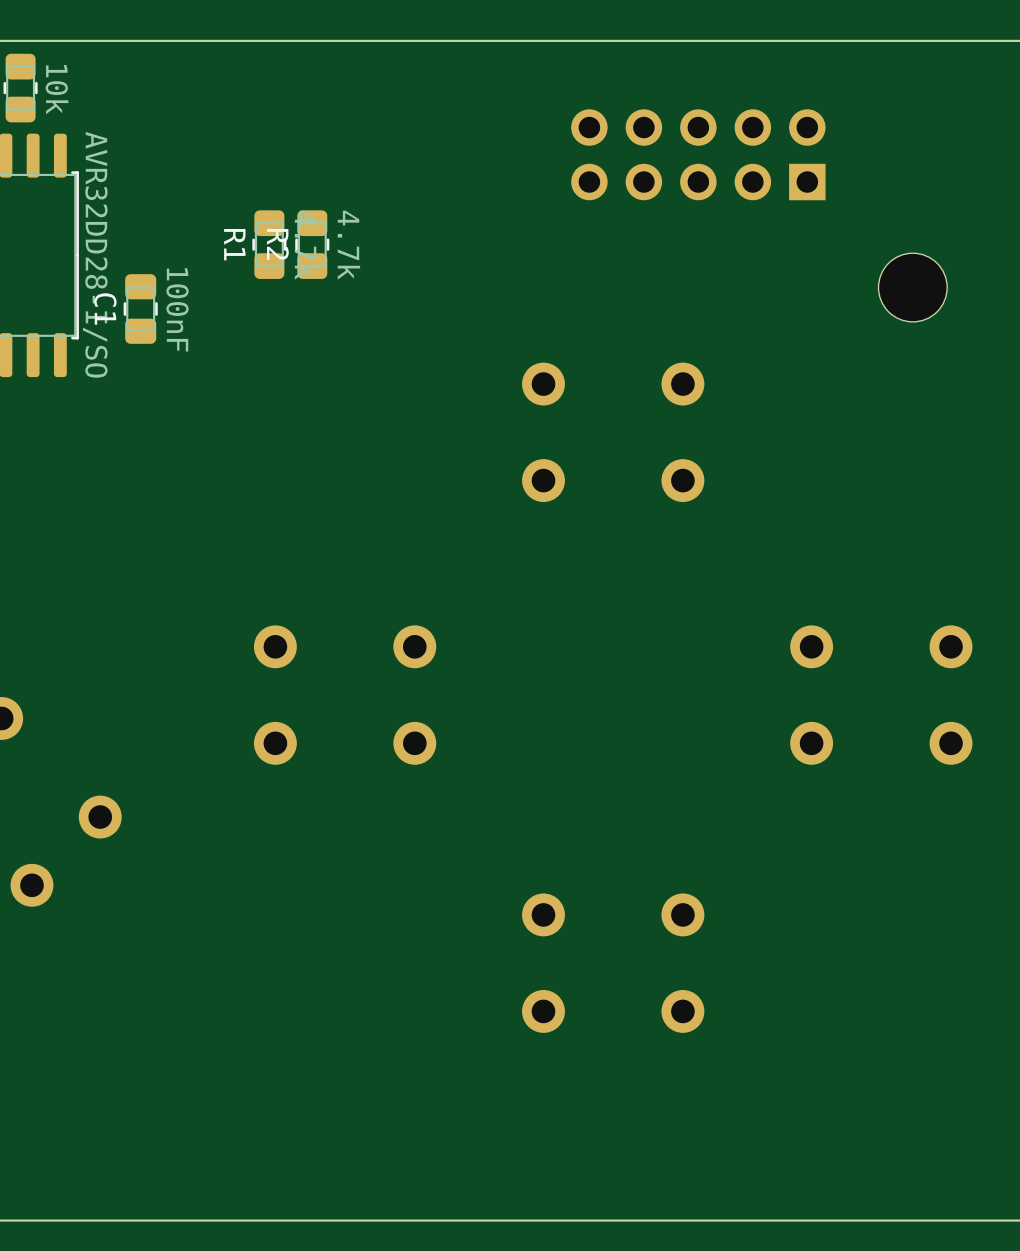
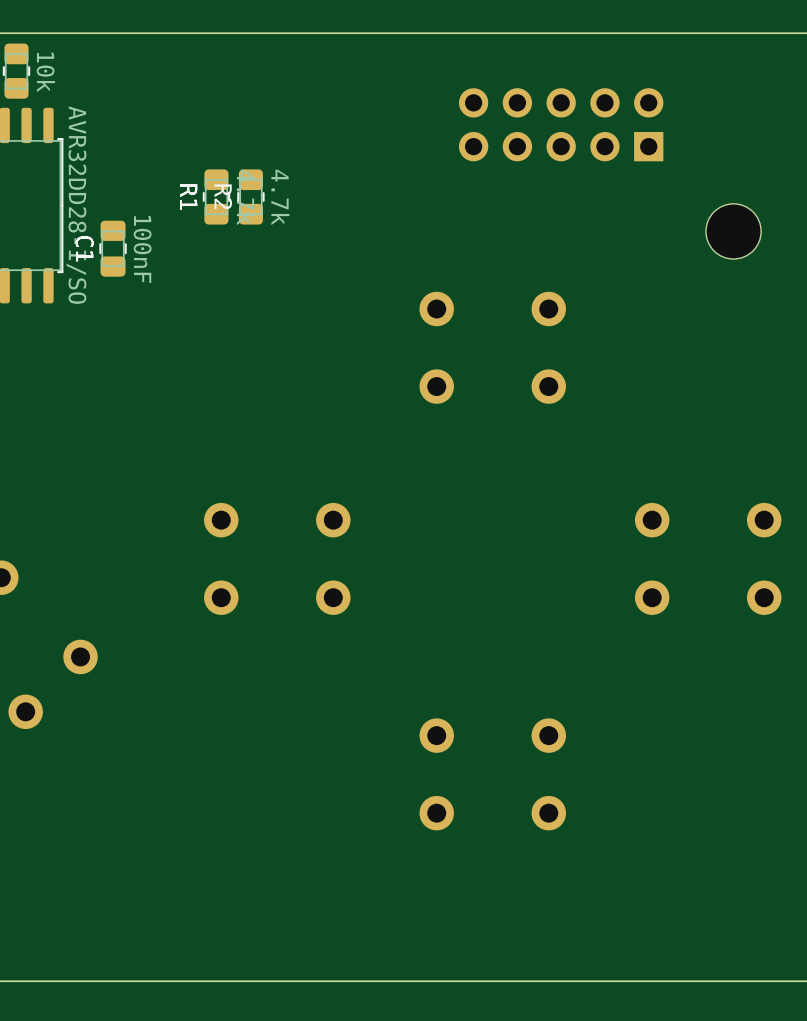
text: none -> R1 (188, 196)
text: none -> C1 (84, 248)

